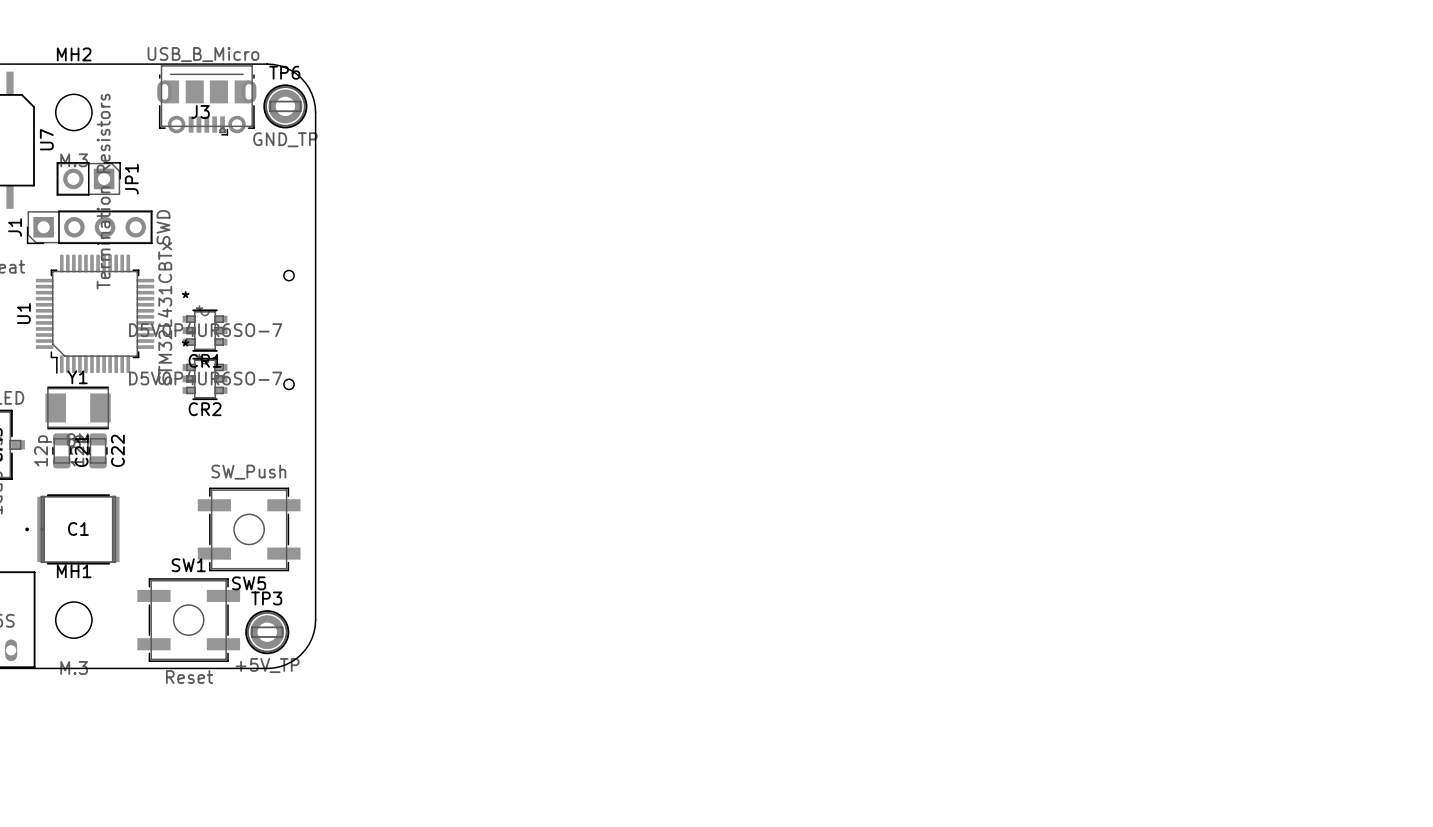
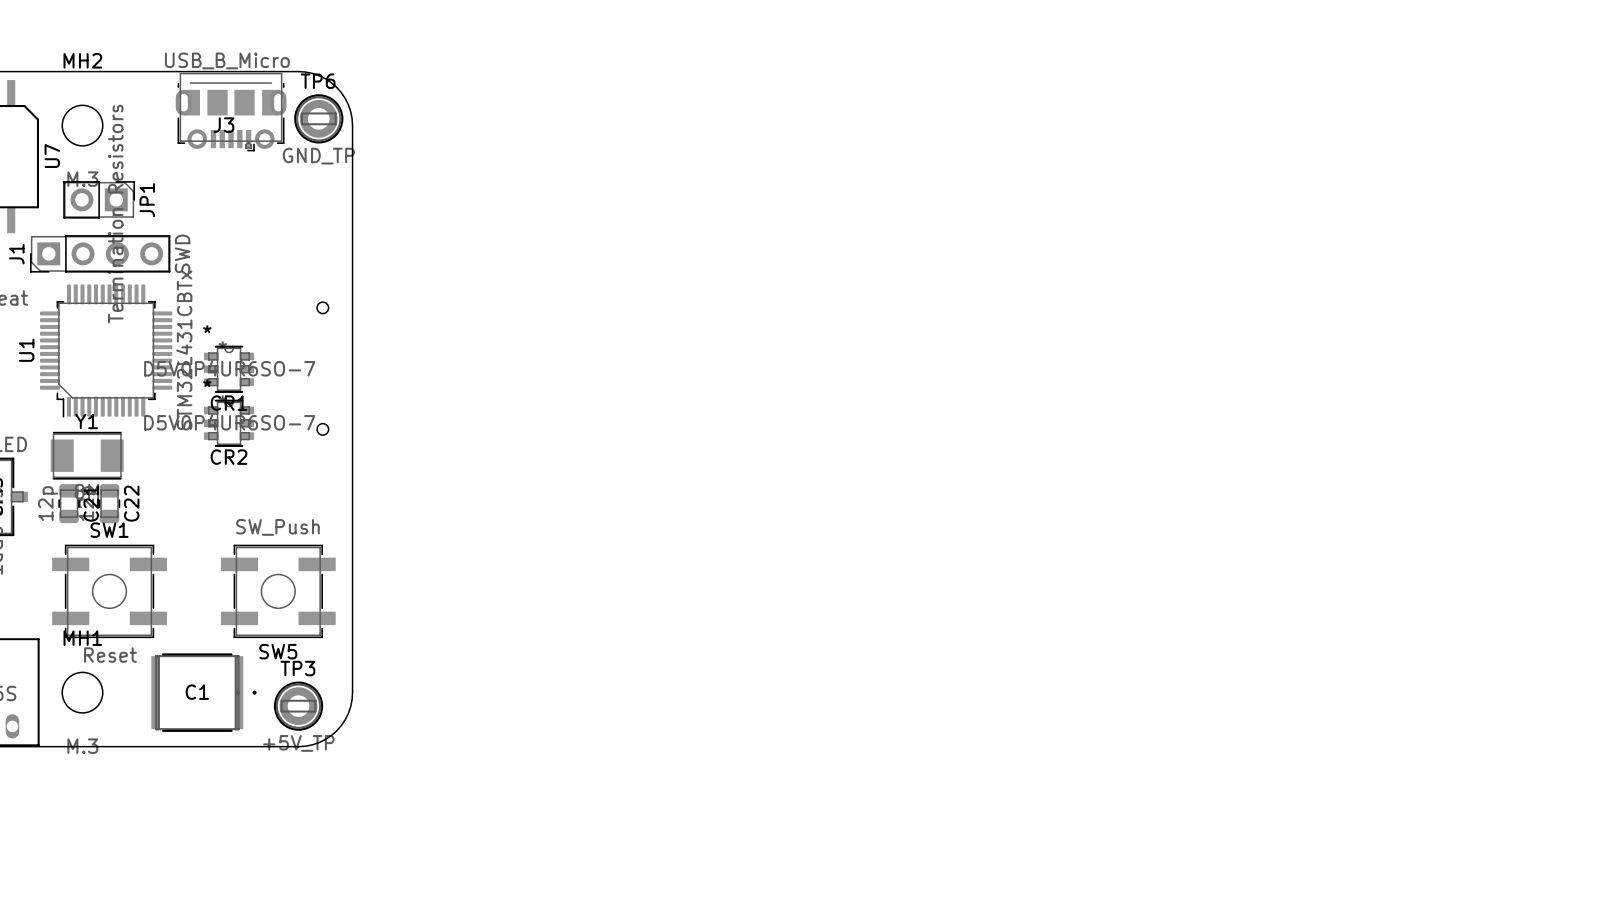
C1 rotation: 0° (72, 529) -> 180° (203, 692)
C1 position: (72, 529) -> (203, 692)
SW1 position: (188, 620) -> (109, 591)

